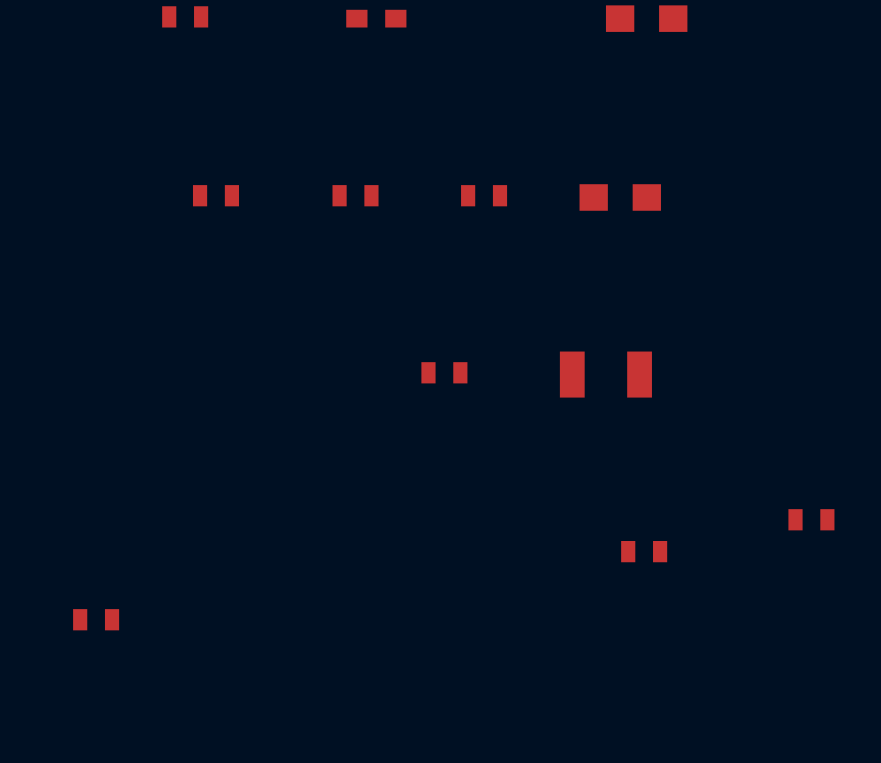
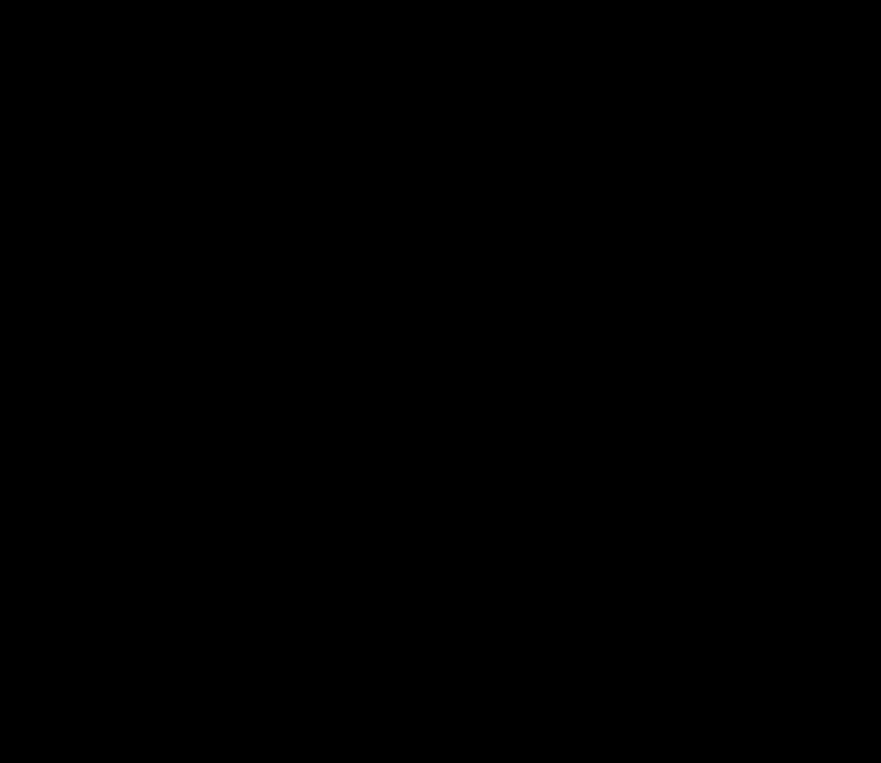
part: (185, 16) -> none
part: (376, 18) -> none
part: (646, 18) -> none
part: (215, 195) -> none
part: (355, 195) -> none
part: (484, 195) -> none
part: (620, 197) -> none
part: (444, 372) -> none
part: (605, 374) -> none
part: (811, 519) -> none
part: (644, 551) -> none
part: (96, 619) -> none

